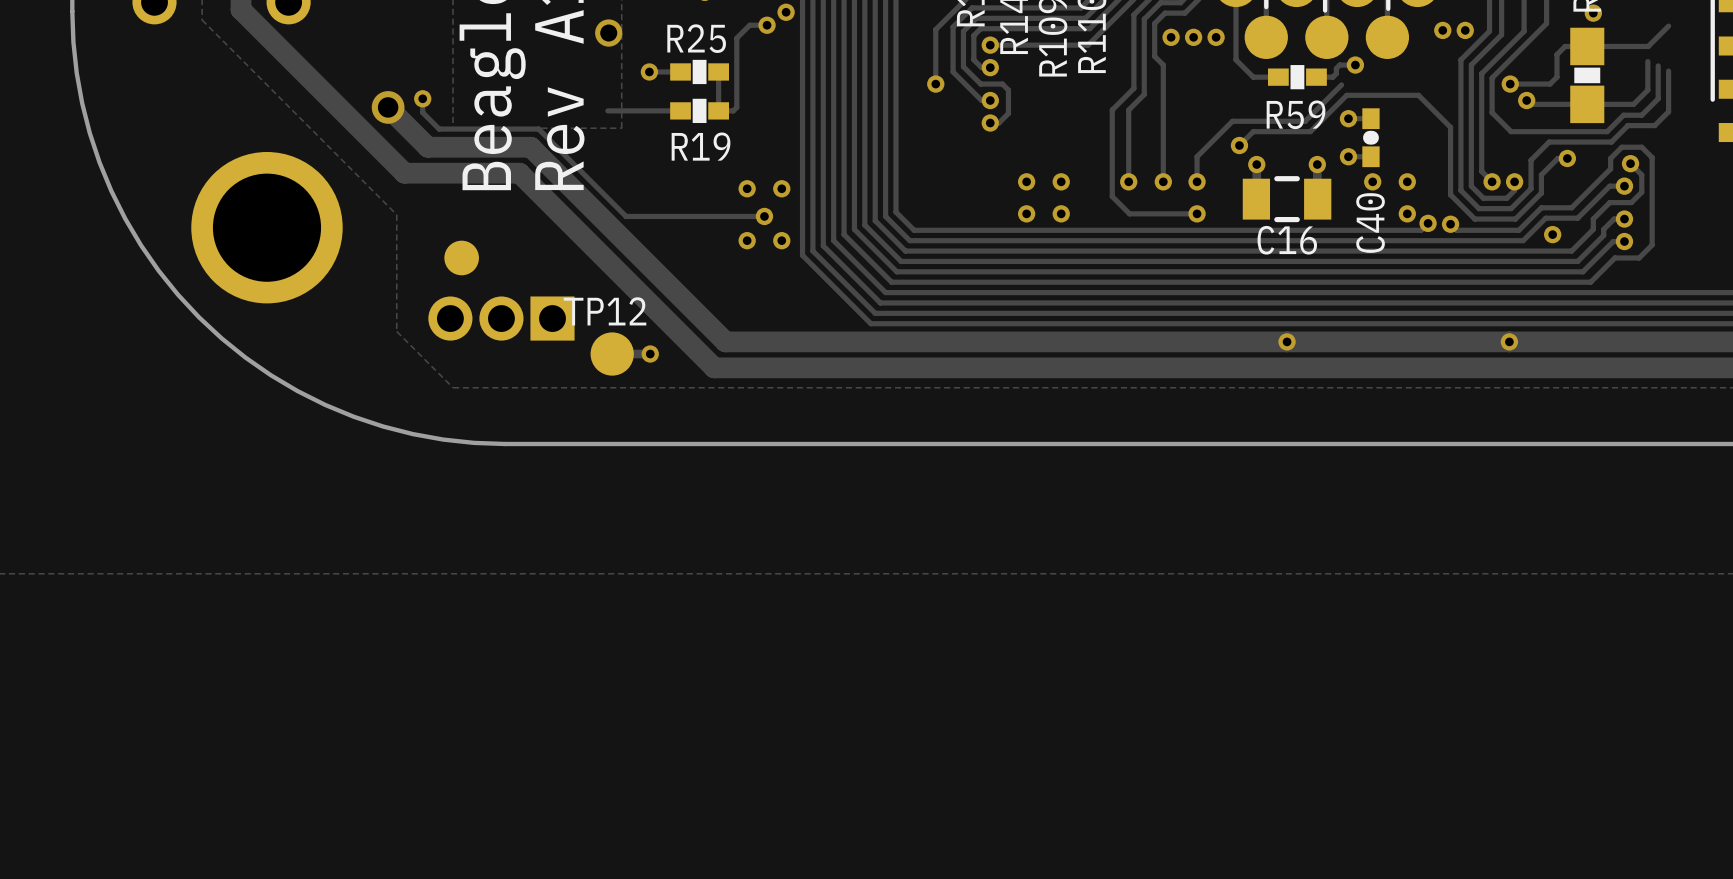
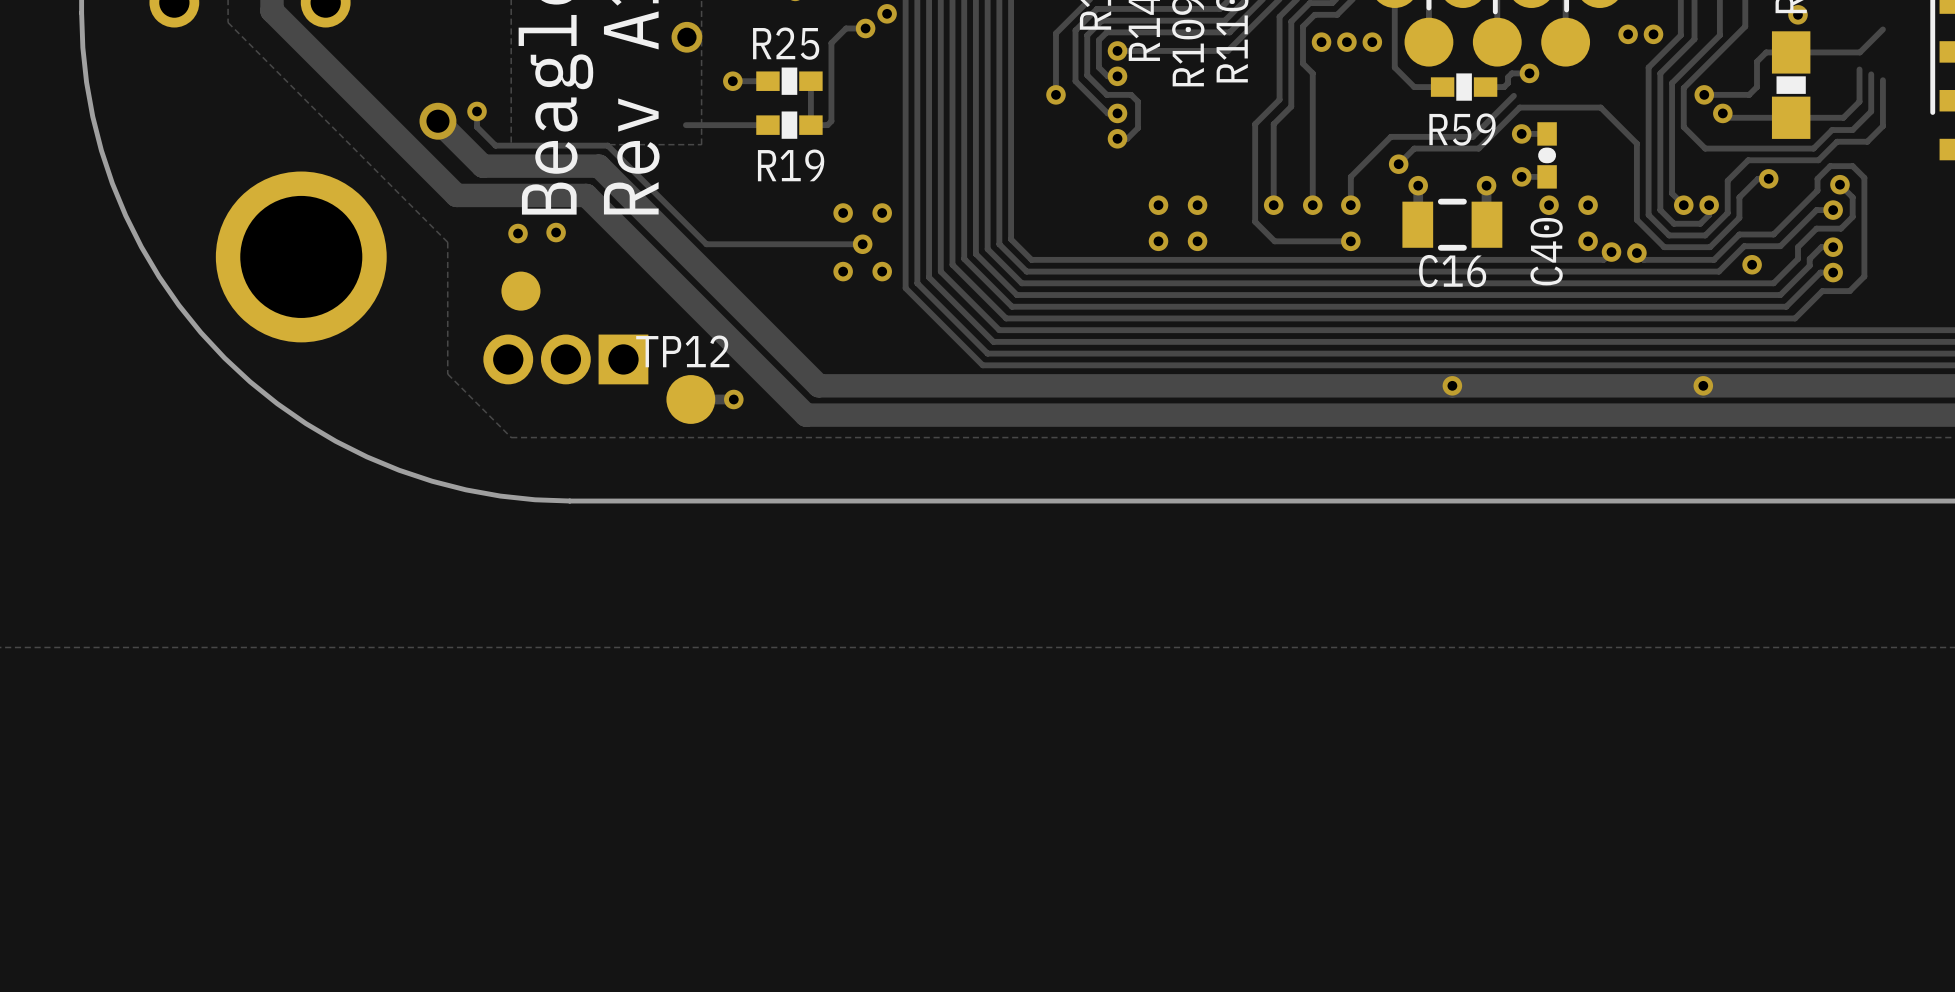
via: none -> (518, 233)
via: none -> (556, 232)

